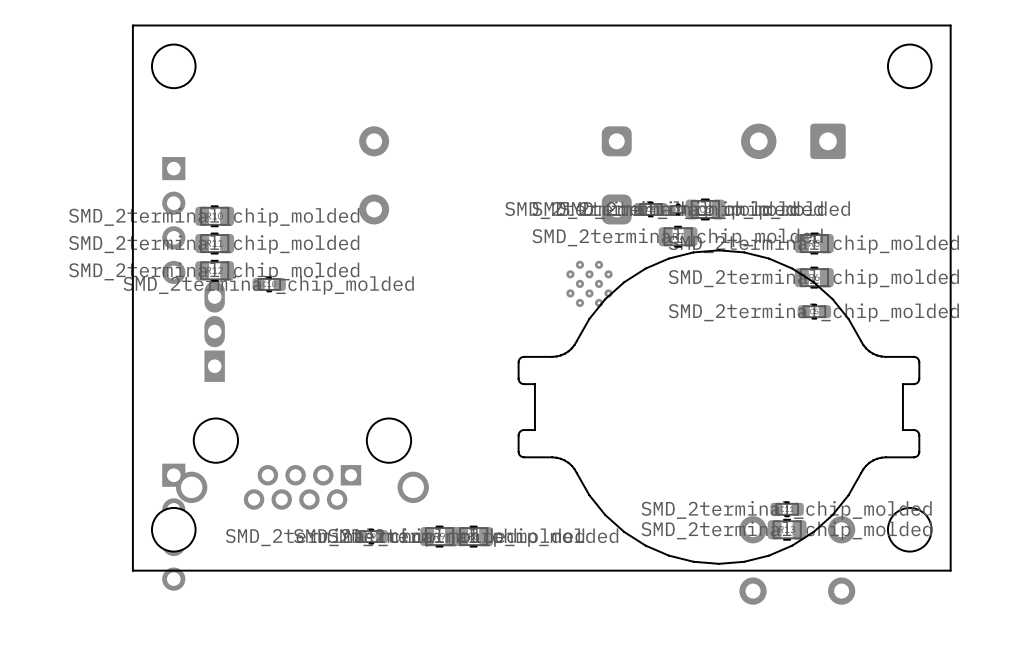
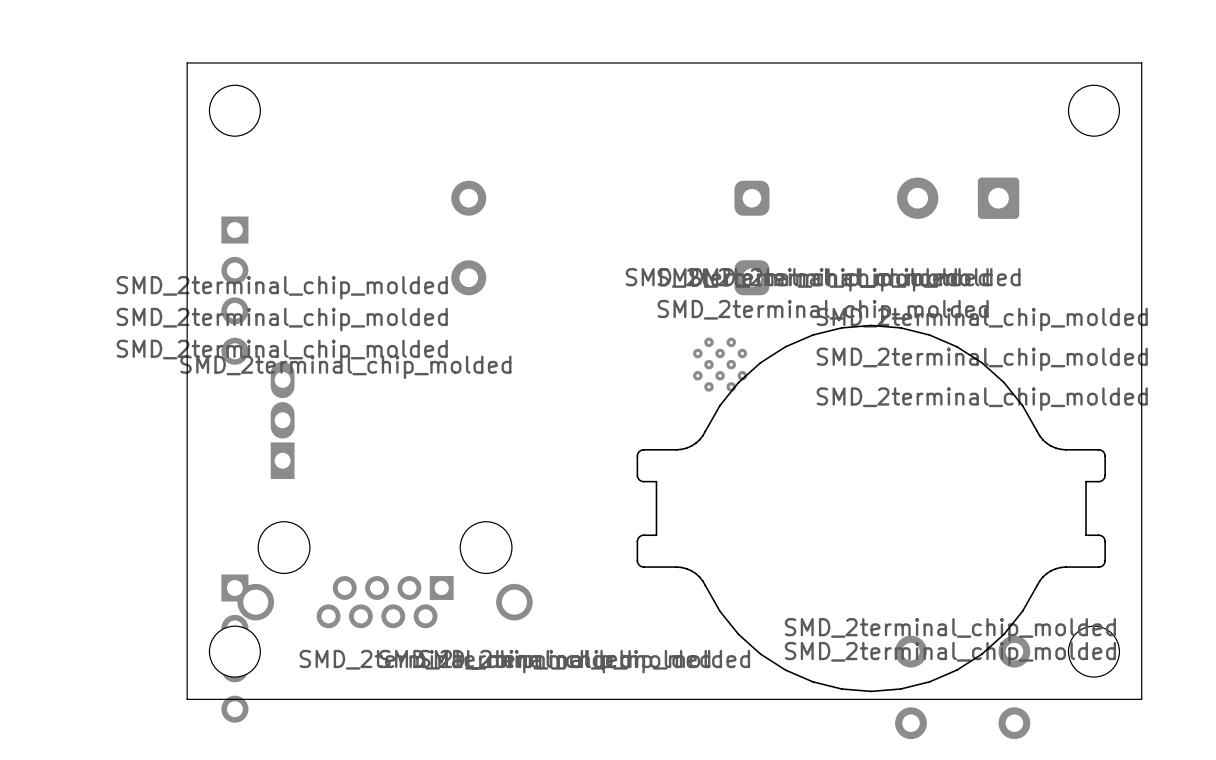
part footprint: [685, 198, 726, 221] -> [689, 268, 1021, 292]
part footprint: [634, 201, 668, 218] -> [625, 268, 957, 292]
part footprint: [667, 203, 689, 216] -> [657, 268, 989, 292]
part footprint: [195, 205, 235, 228] -> [116, 275, 448, 300]
part footprint: [658, 225, 698, 248] -> [657, 299, 989, 324]
part footprint: [195, 232, 235, 255] -> [116, 307, 448, 332]
part footprint: [794, 232, 834, 255] -> [816, 307, 1148, 332]
part footprint: [195, 259, 235, 282] -> [116, 339, 448, 364]
part footprint: [794, 266, 834, 289] -> [816, 347, 1148, 372]
part footprint: [252, 276, 286, 293] -> [180, 355, 512, 380]
part footprint: [797, 303, 832, 320] -> [816, 387, 1148, 411]
part footprint: [770, 501, 804, 518] -> [784, 618, 1117, 642]
part footprint: [767, 518, 807, 541] -> [784, 641, 1117, 666]
part footprint: [420, 525, 459, 548] -> [379, 649, 711, 674]
part footprint: [454, 525, 494, 548] -> [418, 649, 751, 674]
part footprint: [354, 528, 389, 545] -> [299, 649, 631, 674]

